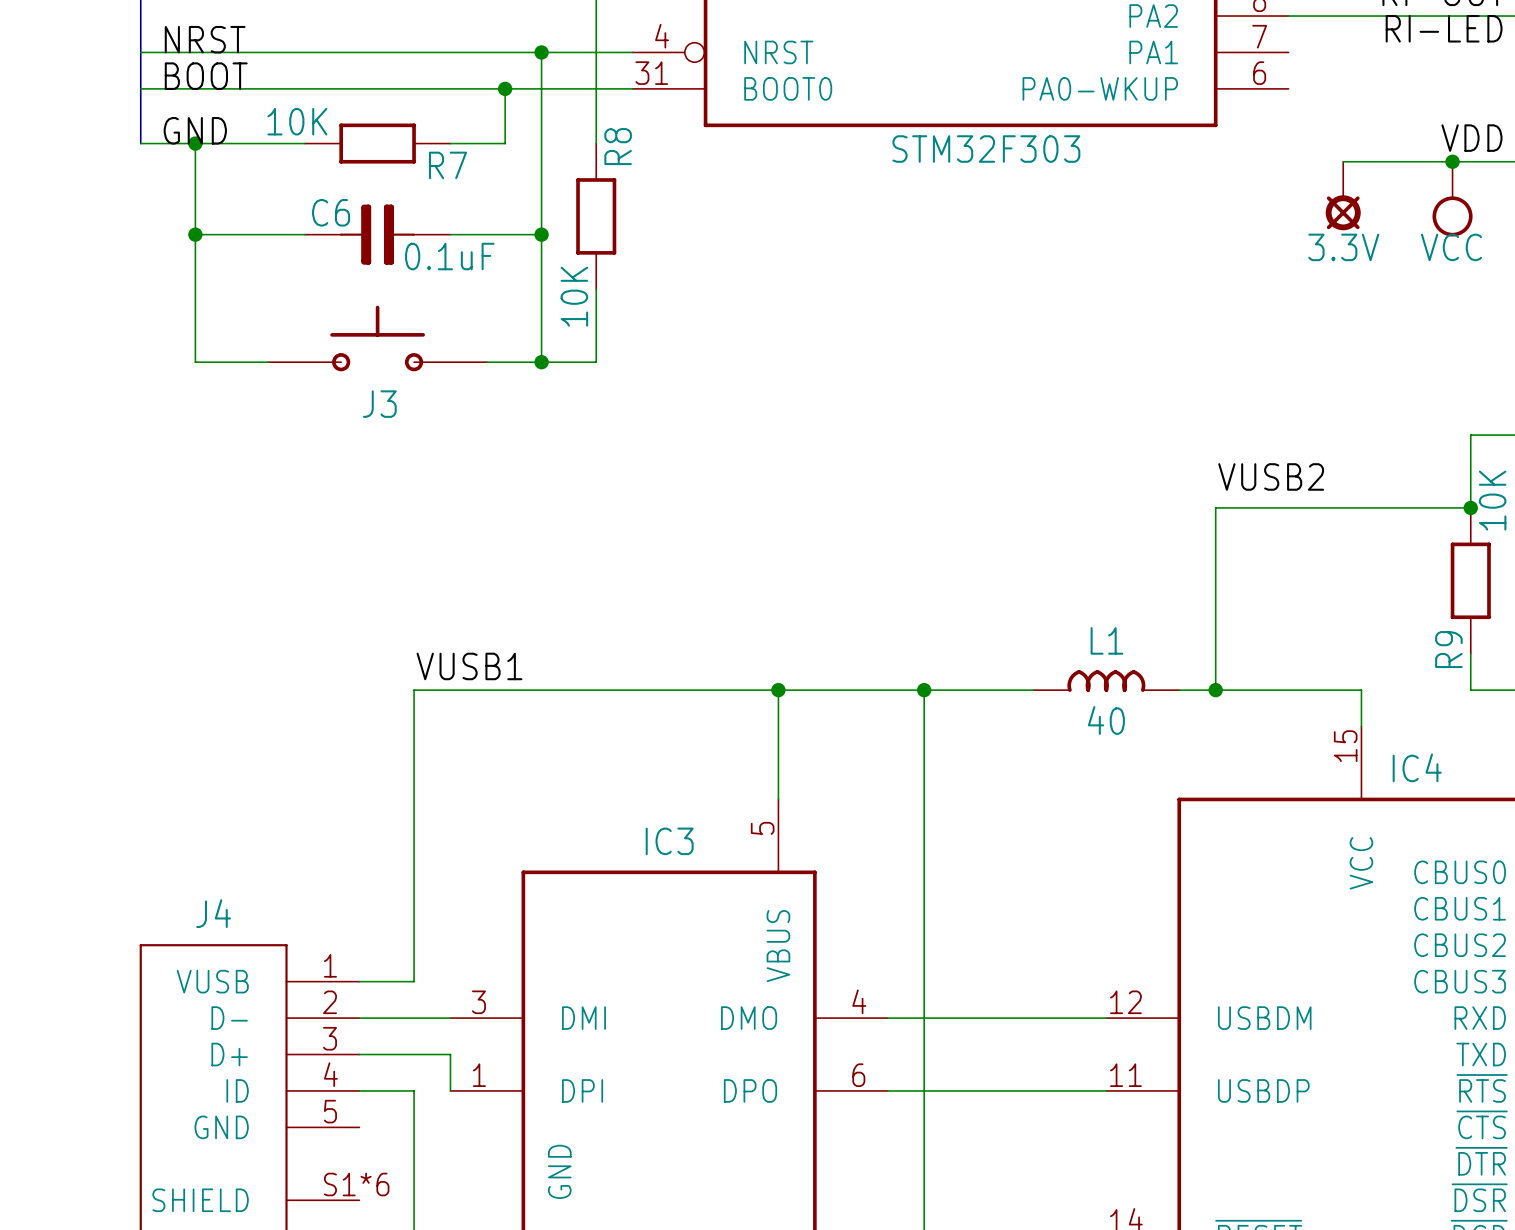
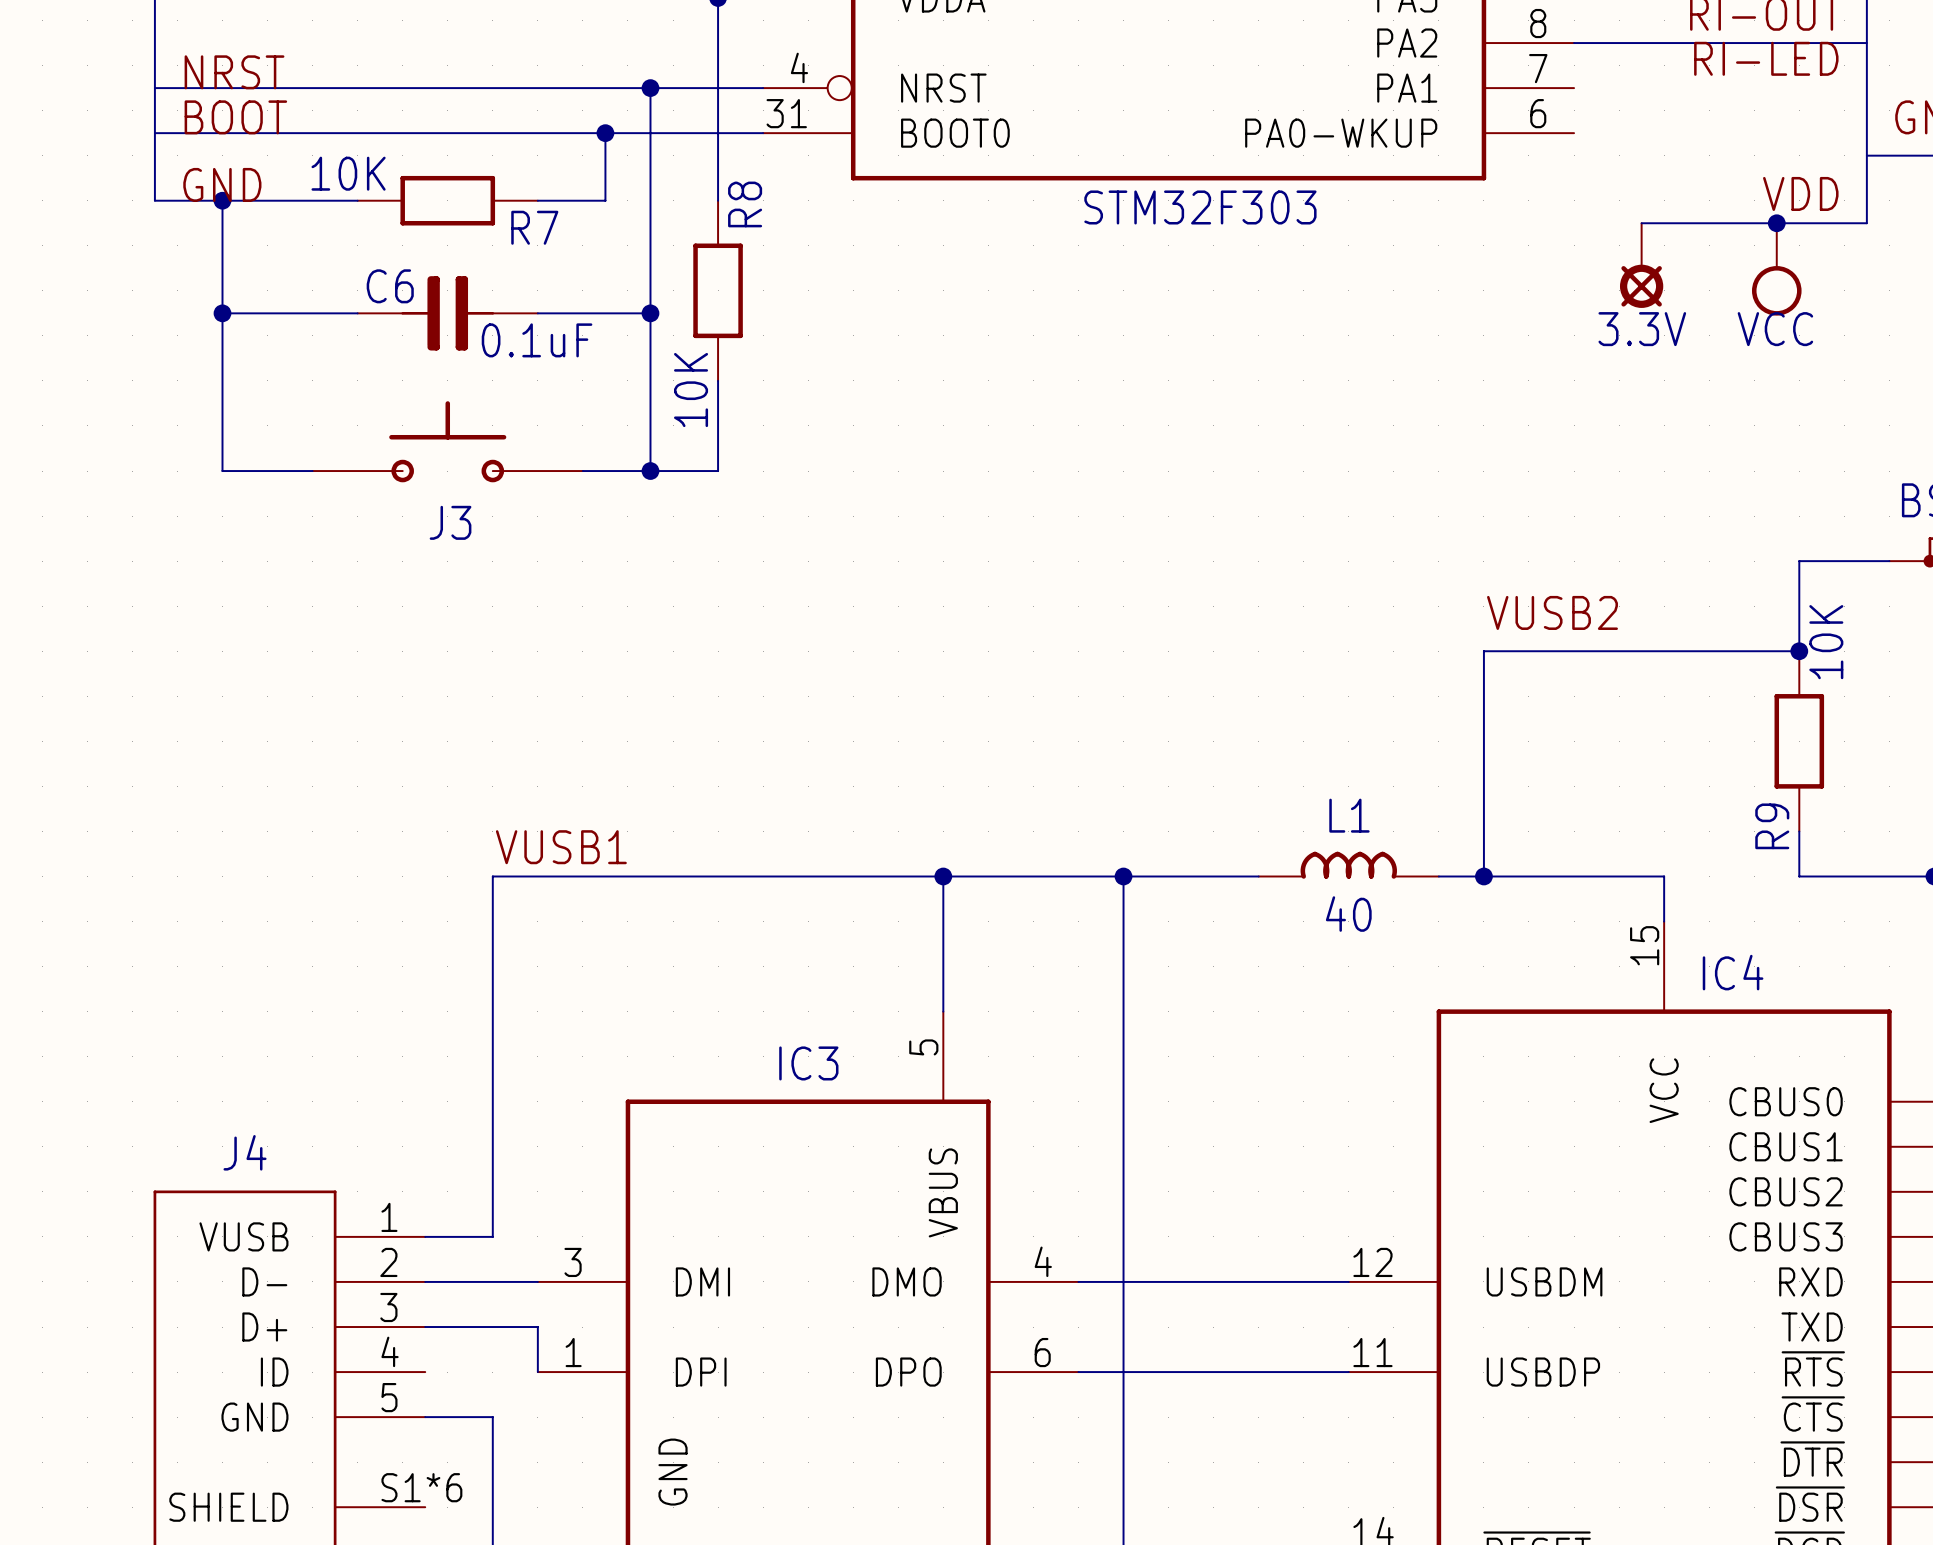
wire: (359, 1090) (414, 1090) (414, 1127) -> (425, 1417) (492, 1417)

